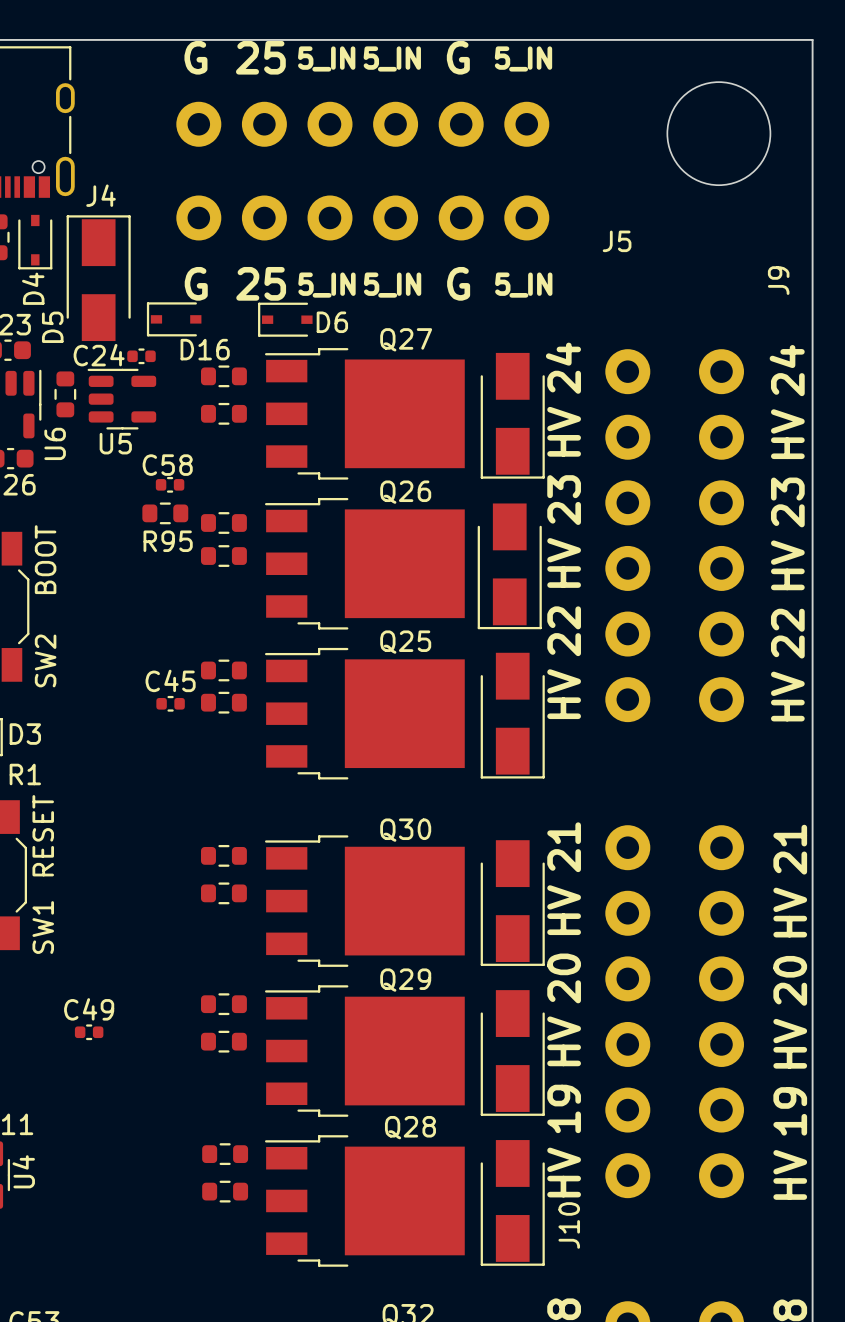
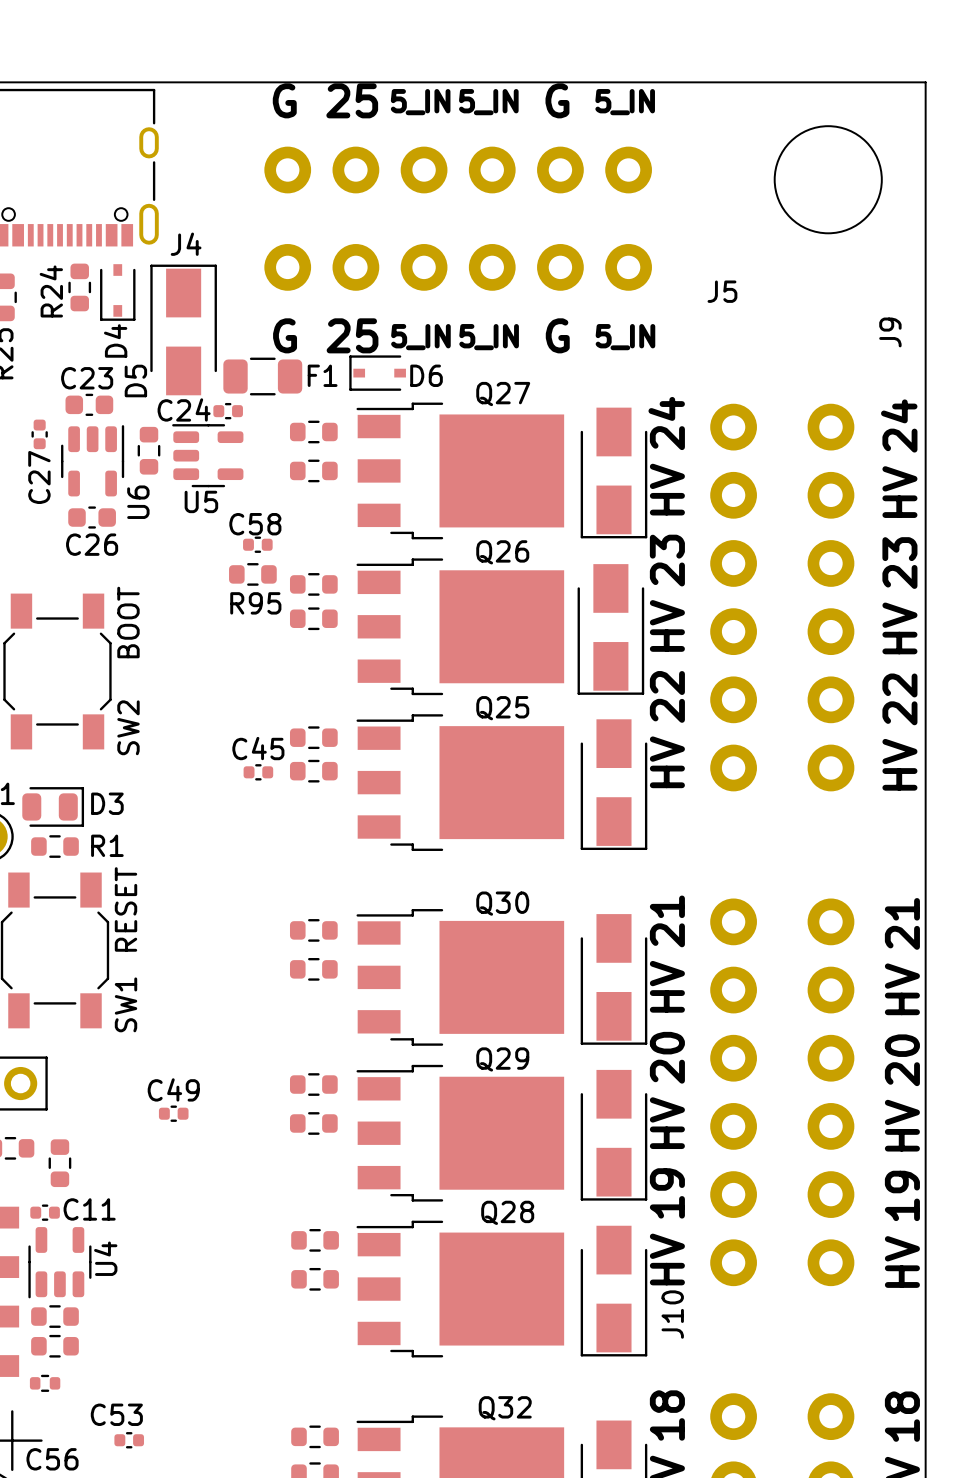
D16: (174, 319) -> none
F1: none -> (262, 376)

